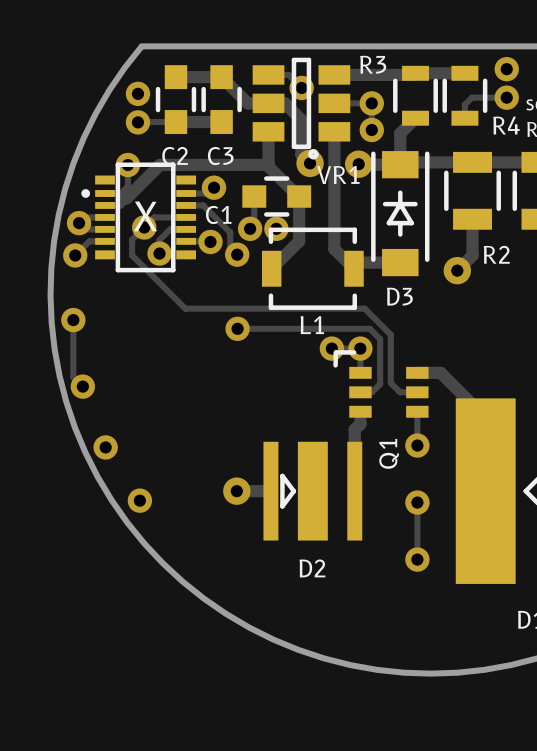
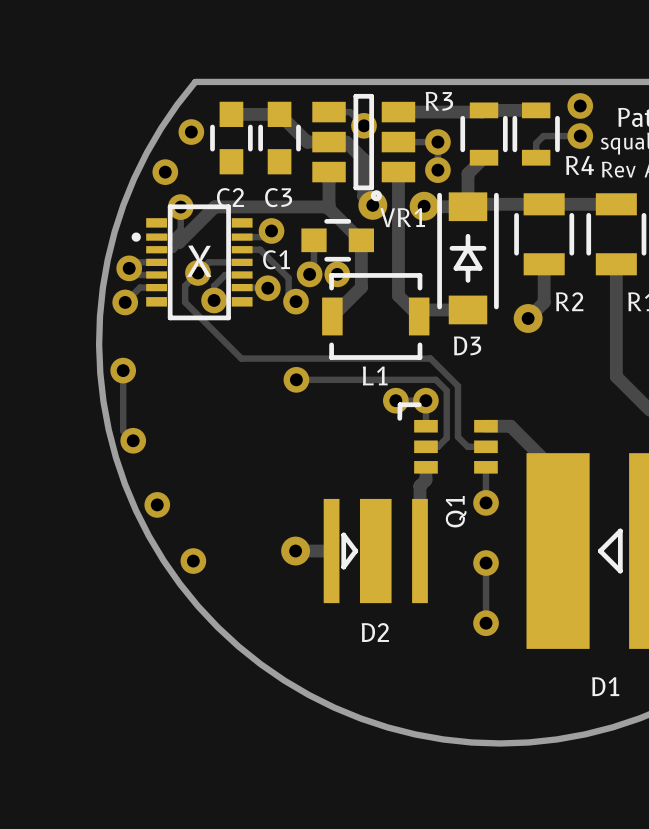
via position: (137, 122) -> (165, 172)
track: (138, 122) (221, 122) -> none

